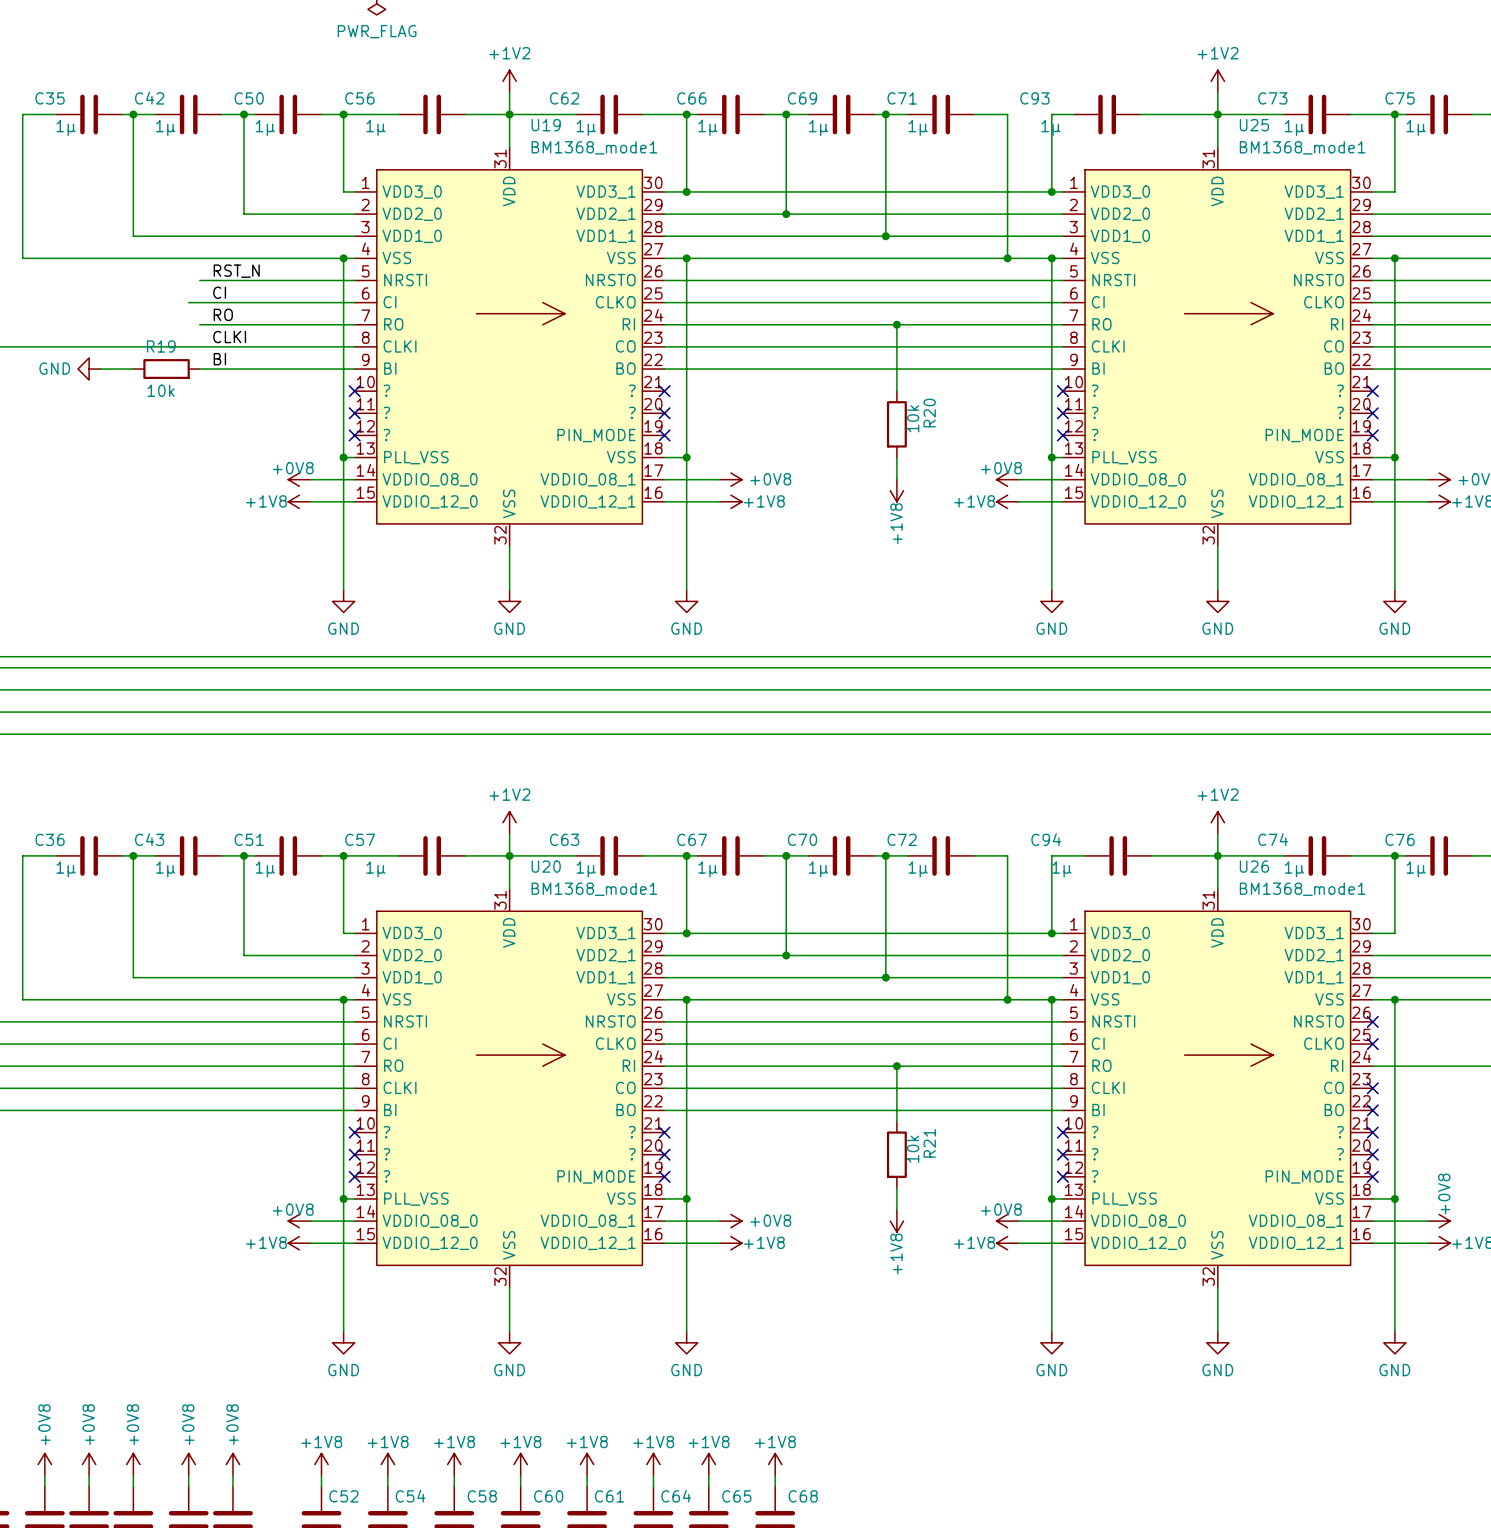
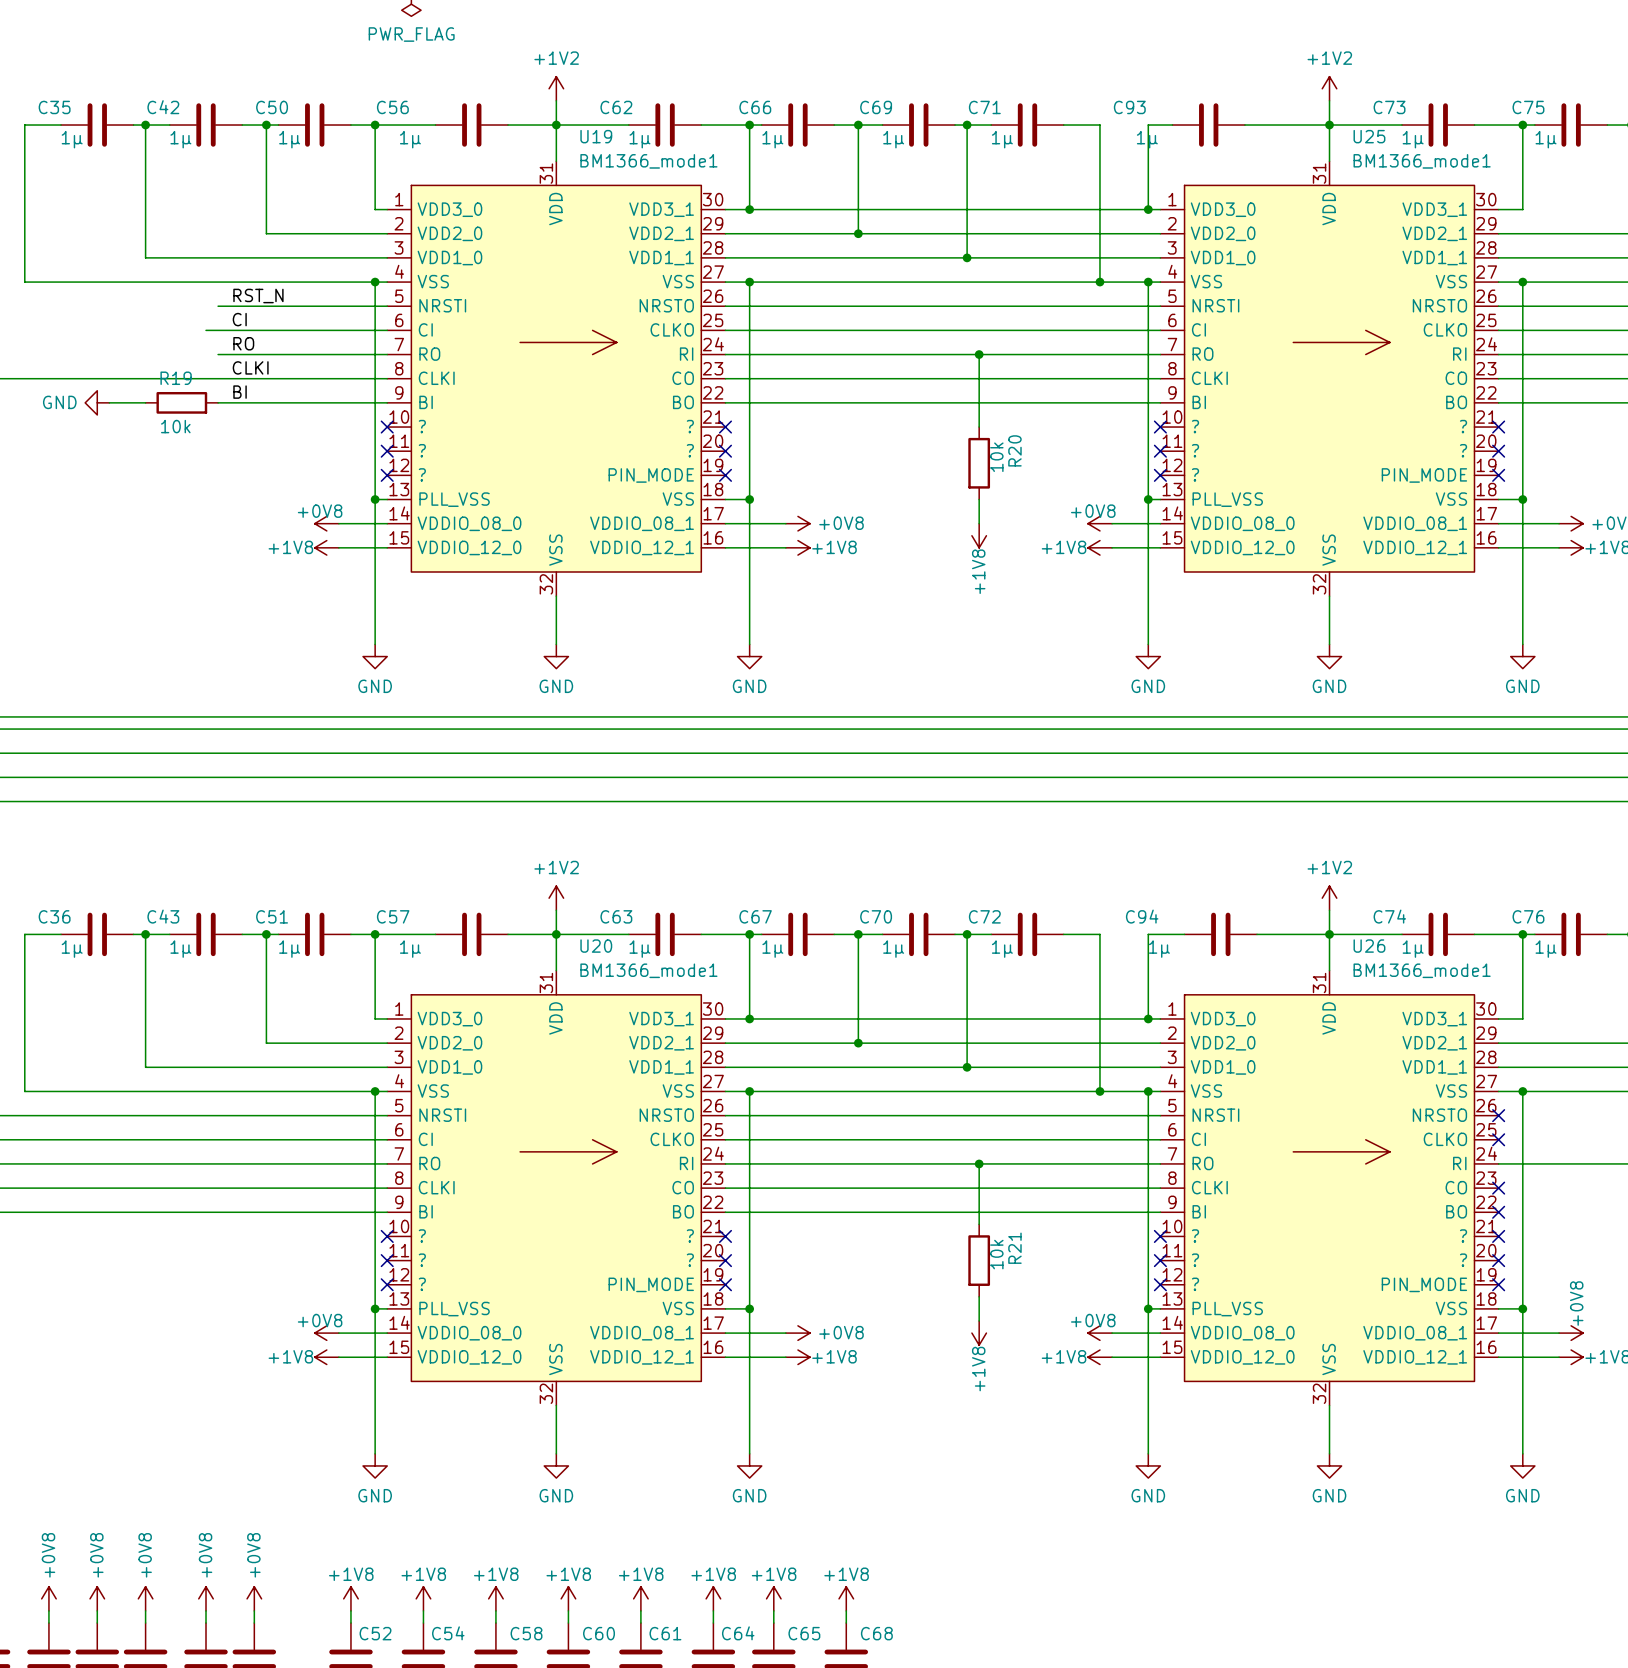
U19 value: BM1368_mode1 (594, 147) -> BM1366_mode1 (648, 161)
U25 value: BM1368_mode1 (1302, 147) -> BM1366_mode1 (1422, 161)
U20 value: BM1368_mode1 (594, 889) -> BM1366_mode1 (648, 970)
U26 value: BM1368_mode1 (1302, 889) -> BM1366_mode1 (1422, 970)

